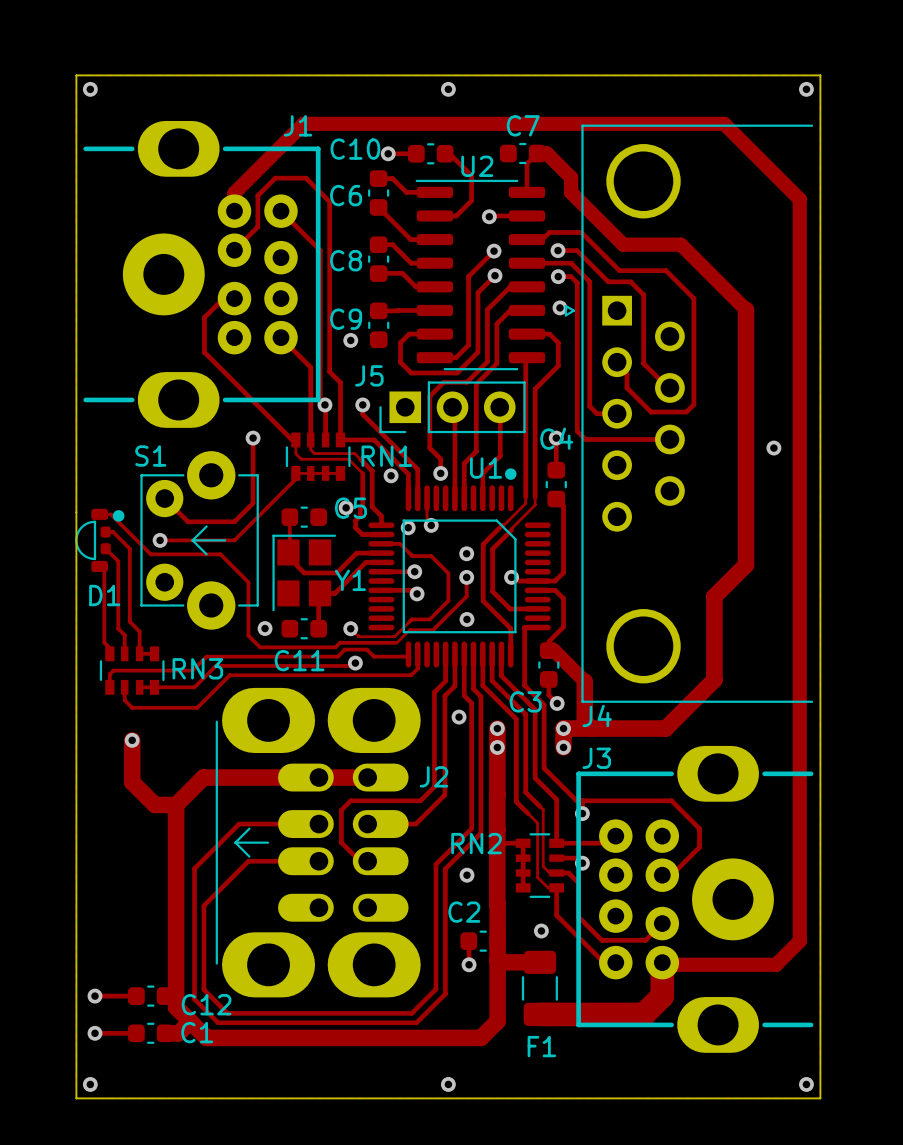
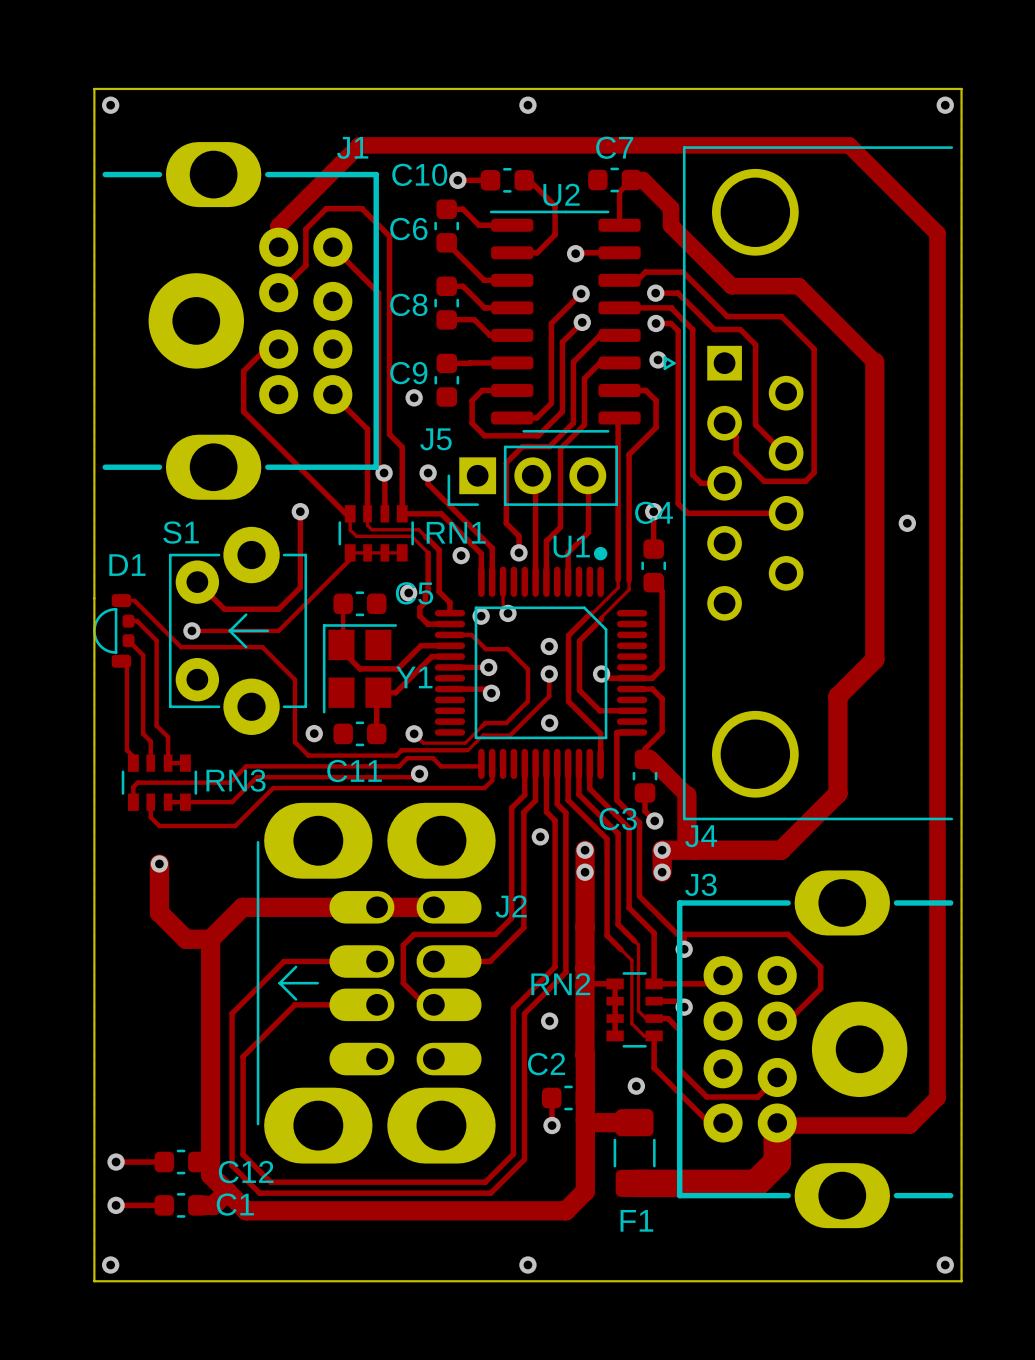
drawing: [112, 510, 125, 522] -> none
D1 name position: D1 (104, 595) -> D1 (127, 565)

